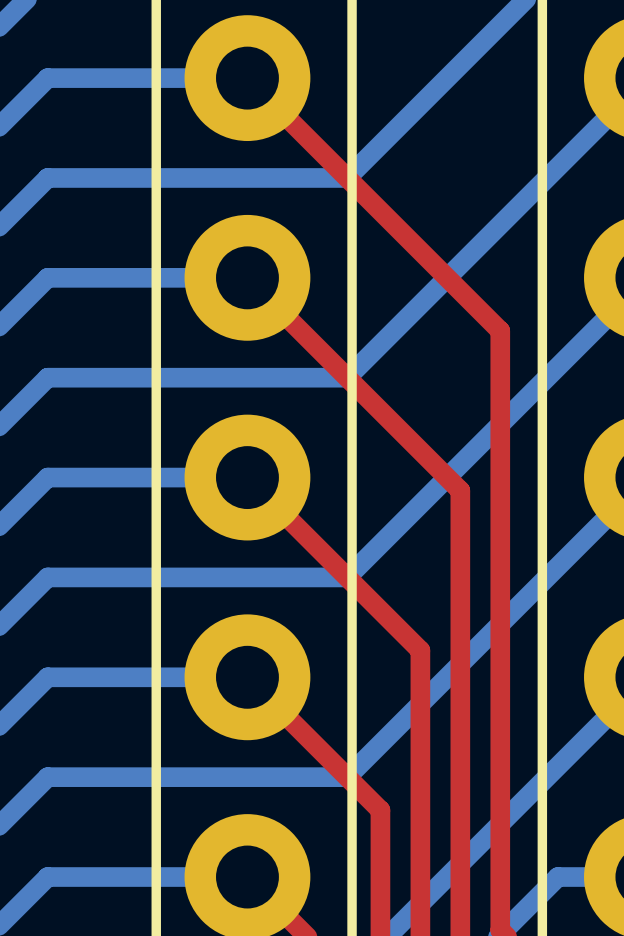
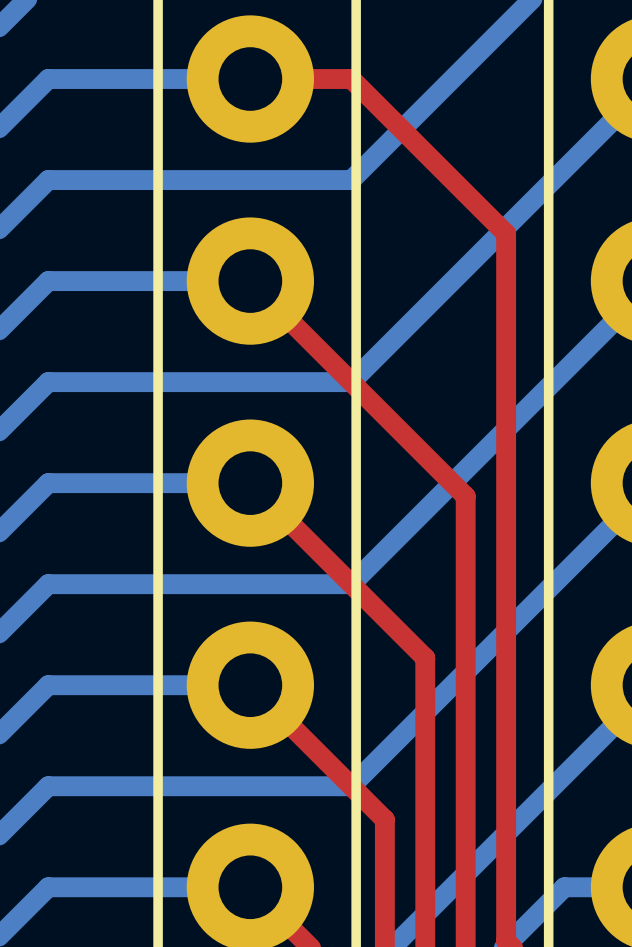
top track: (247, 78) (500, 330) -> (250, 79) (351, 79) (506, 233) (506, 334)

